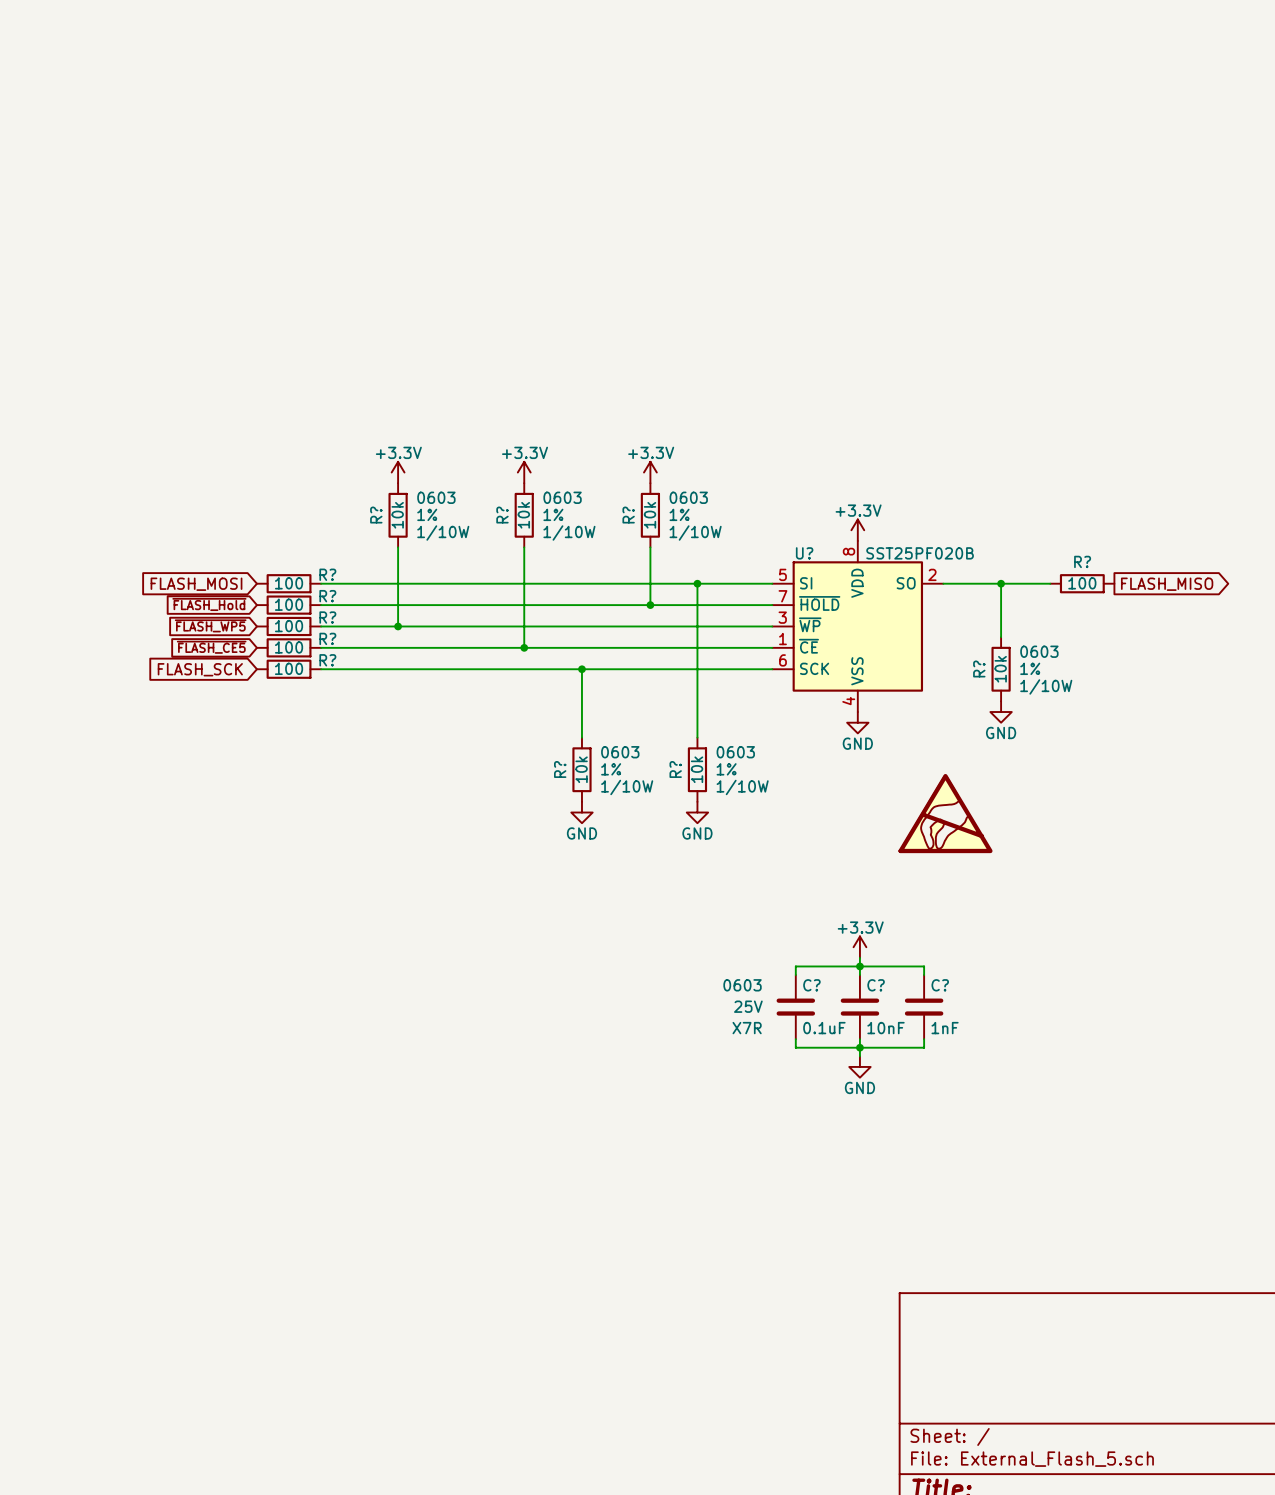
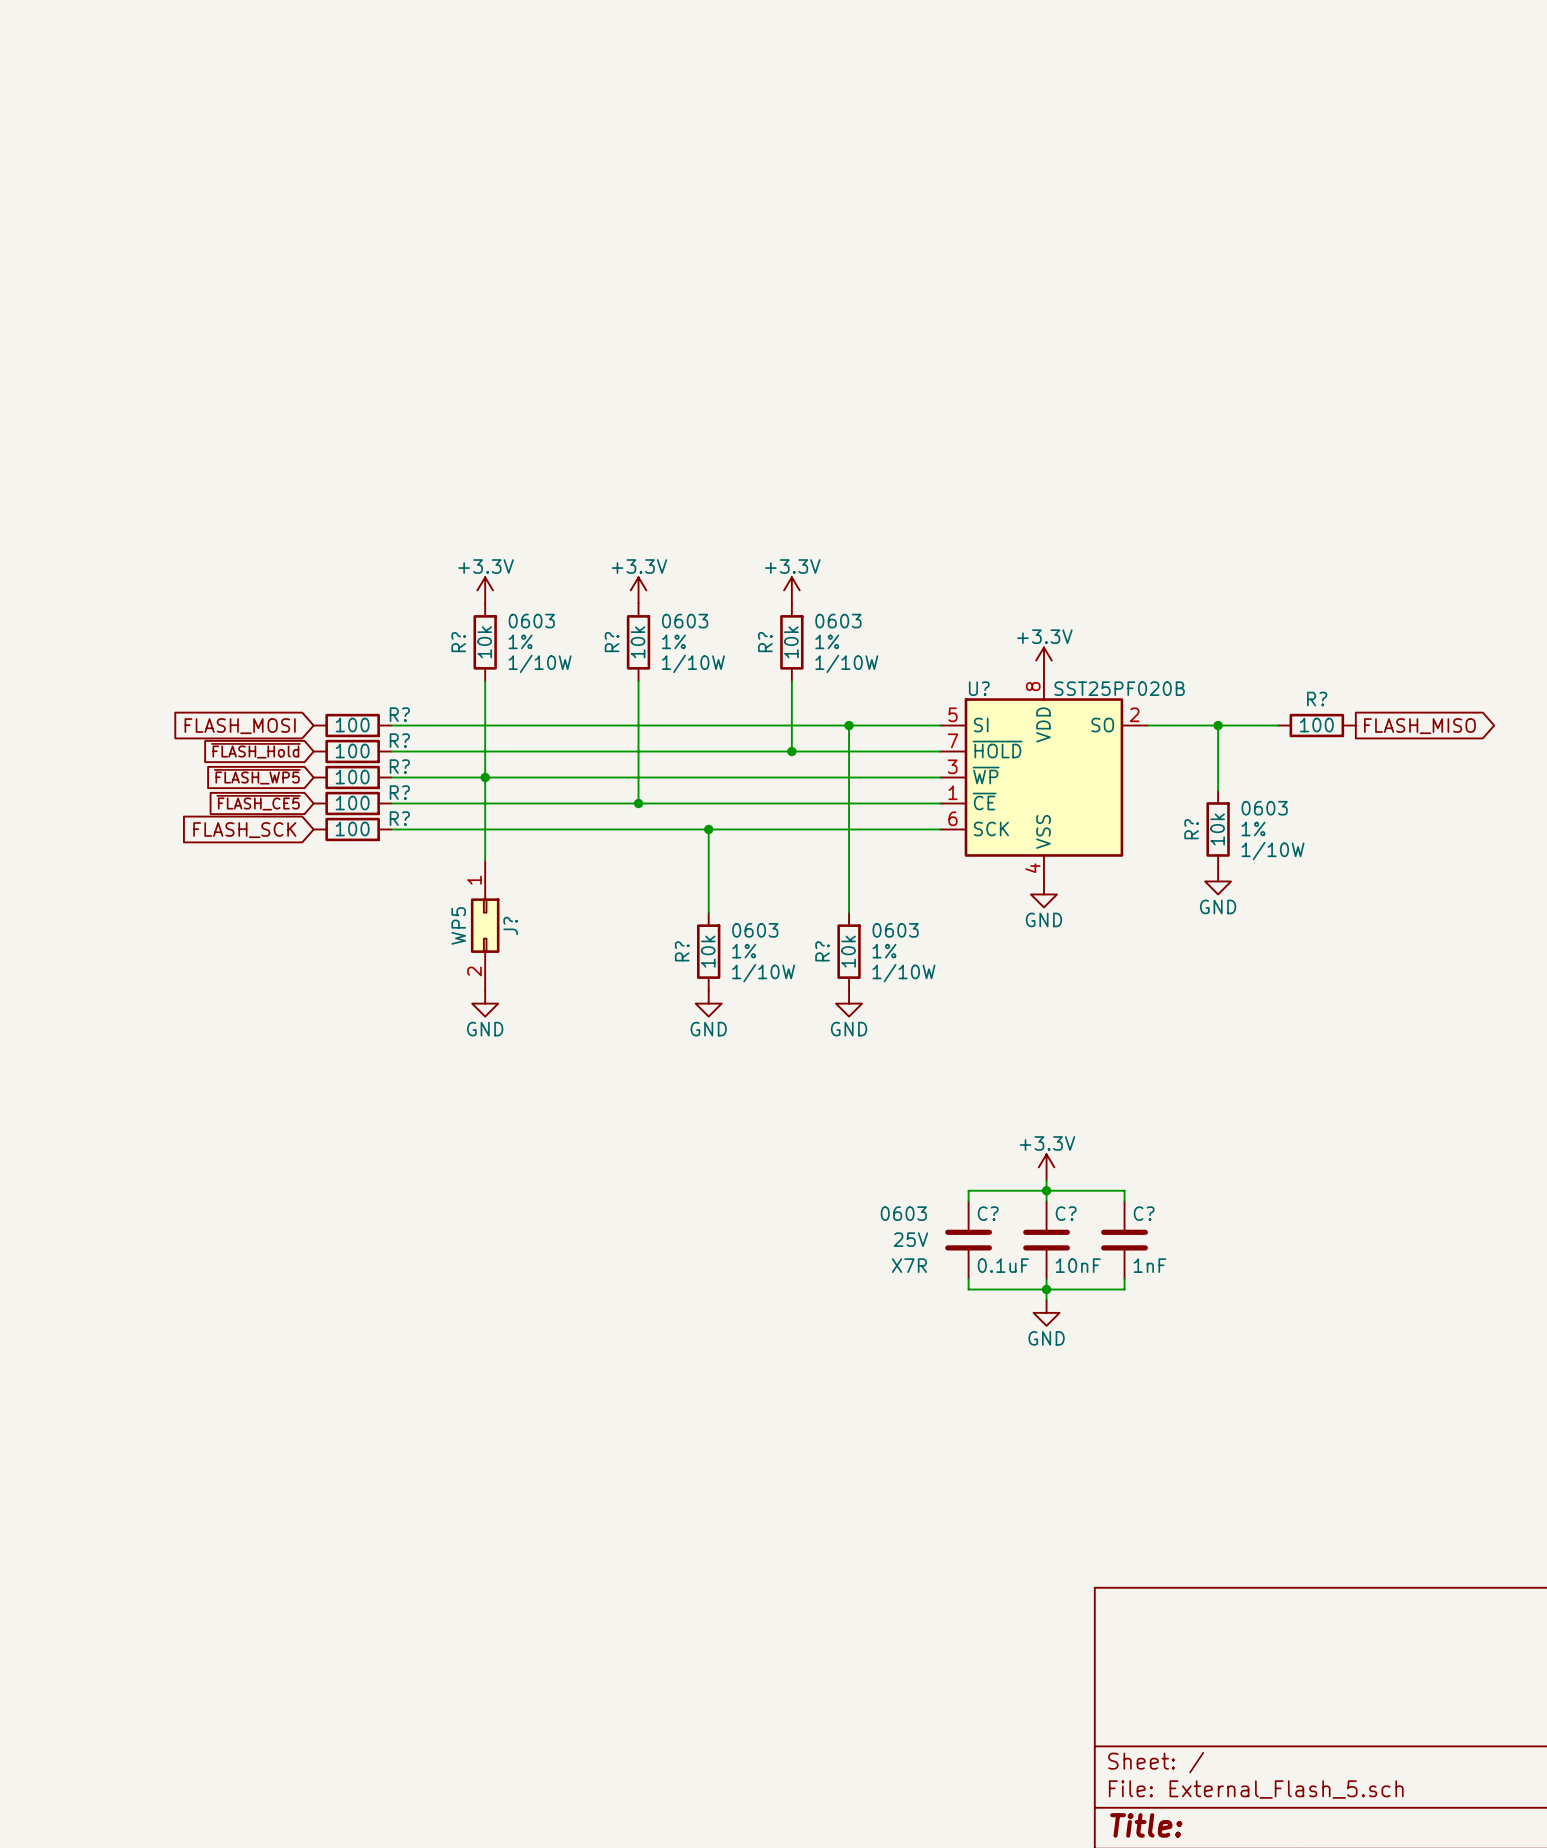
wire: none -> (485, 777) (485, 860)
J?: none -> WP5 (485, 925)
power symbol: none -> GND (485, 1003)
power symbol: (945, 813) -> none

